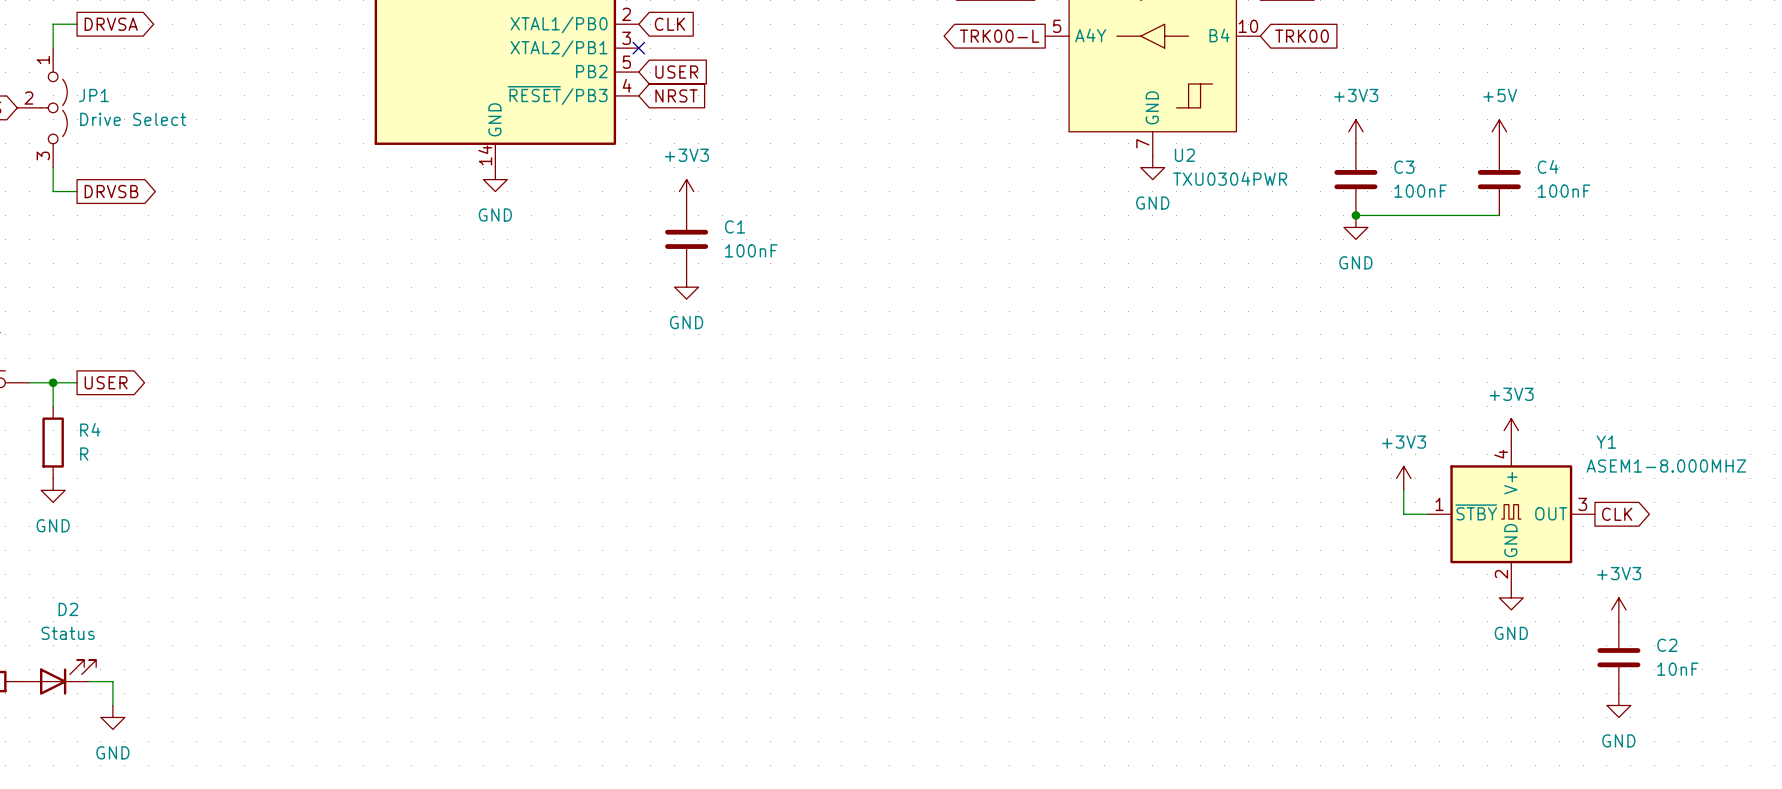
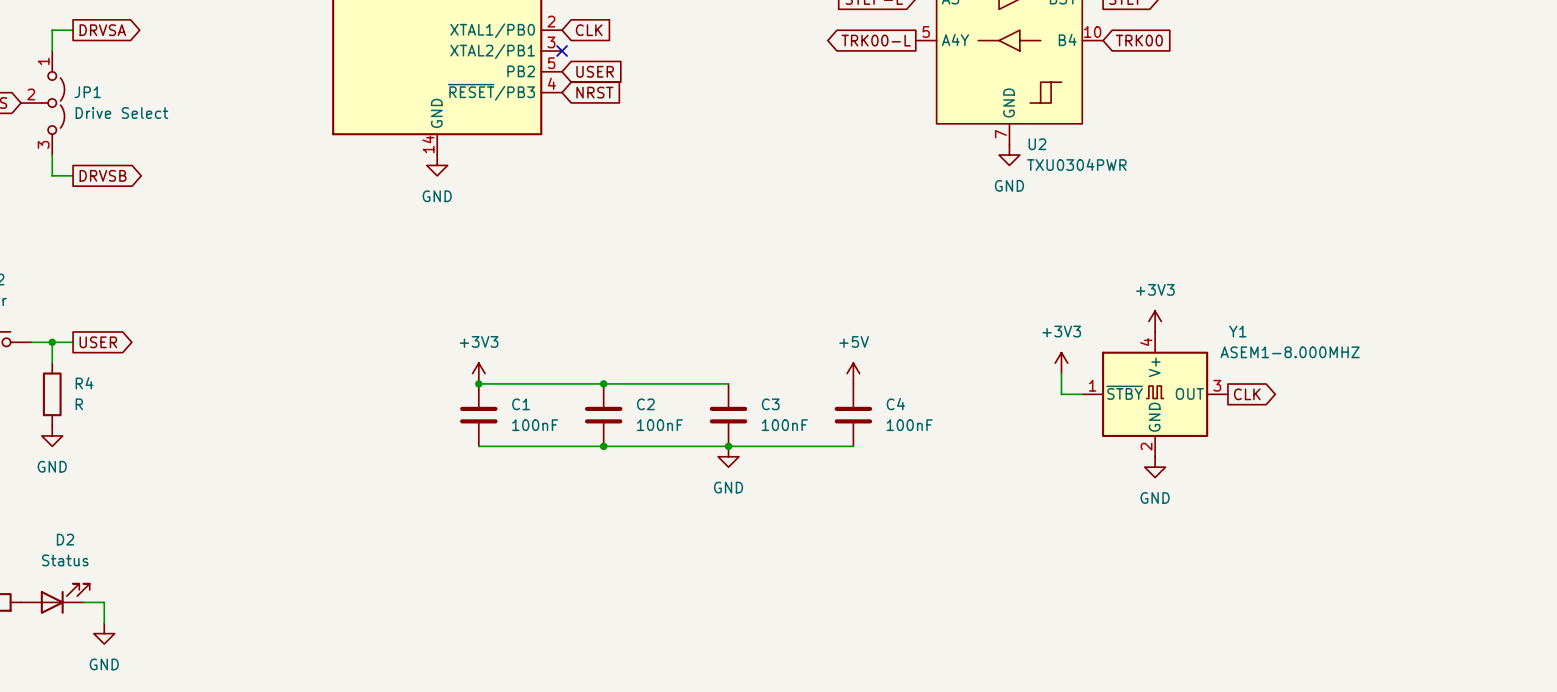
power symbol: +3V3 (1355, 131) -> none
power symbol: +5V (1499, 131) -> none
C3 position: (1355, 179) -> (728, 415)
C4 position: (1499, 179) -> (853, 415)
power symbol: +3V3 (686, 191) -> none
wire: (1355, 215) (1499, 215) -> none
junction: (1355, 215) -> none
power symbol: GND (1355, 227) -> none
C1 position: (686, 239) -> (478, 415)
power symbol: GND (686, 287) -> none
power symbol: none -> +3V3 (1155, 321)
power symbol: none -> +3V3 (1061, 363)
power symbol: none -> +3V3 (478, 373)
power symbol: none -> +5V (853, 373)
wire: none -> (478, 383) (728, 383)
junction: none -> (478, 383)
junction: none -> (603, 383)
power symbol: +3V3 (1511, 430) -> none
power symbol: +3V3 (1403, 478) -> none
wire: (1403, 490) (1403, 514) (1427, 514) -> (1061, 373) (1061, 394) (1082, 394)
wire: none -> (478, 446) (853, 446)
junction: none -> (603, 446)
junction: none -> (728, 446)
power symbol: none -> GND (728, 456)
Y1 position: (1511, 514) -> (1155, 394)
global label position: CLK (1617, 514) -> CLK (1247, 394)
power symbol: none -> GND (1155, 467)
power symbol: GND (1511, 597) -> none
power symbol: +3V3 (1618, 609) -> none
C2 position: (1618, 657) -> (603, 415)
C2 value: 10nF (1677, 669) -> 100nF (659, 425)
power symbol: GND (1618, 705) -> none

